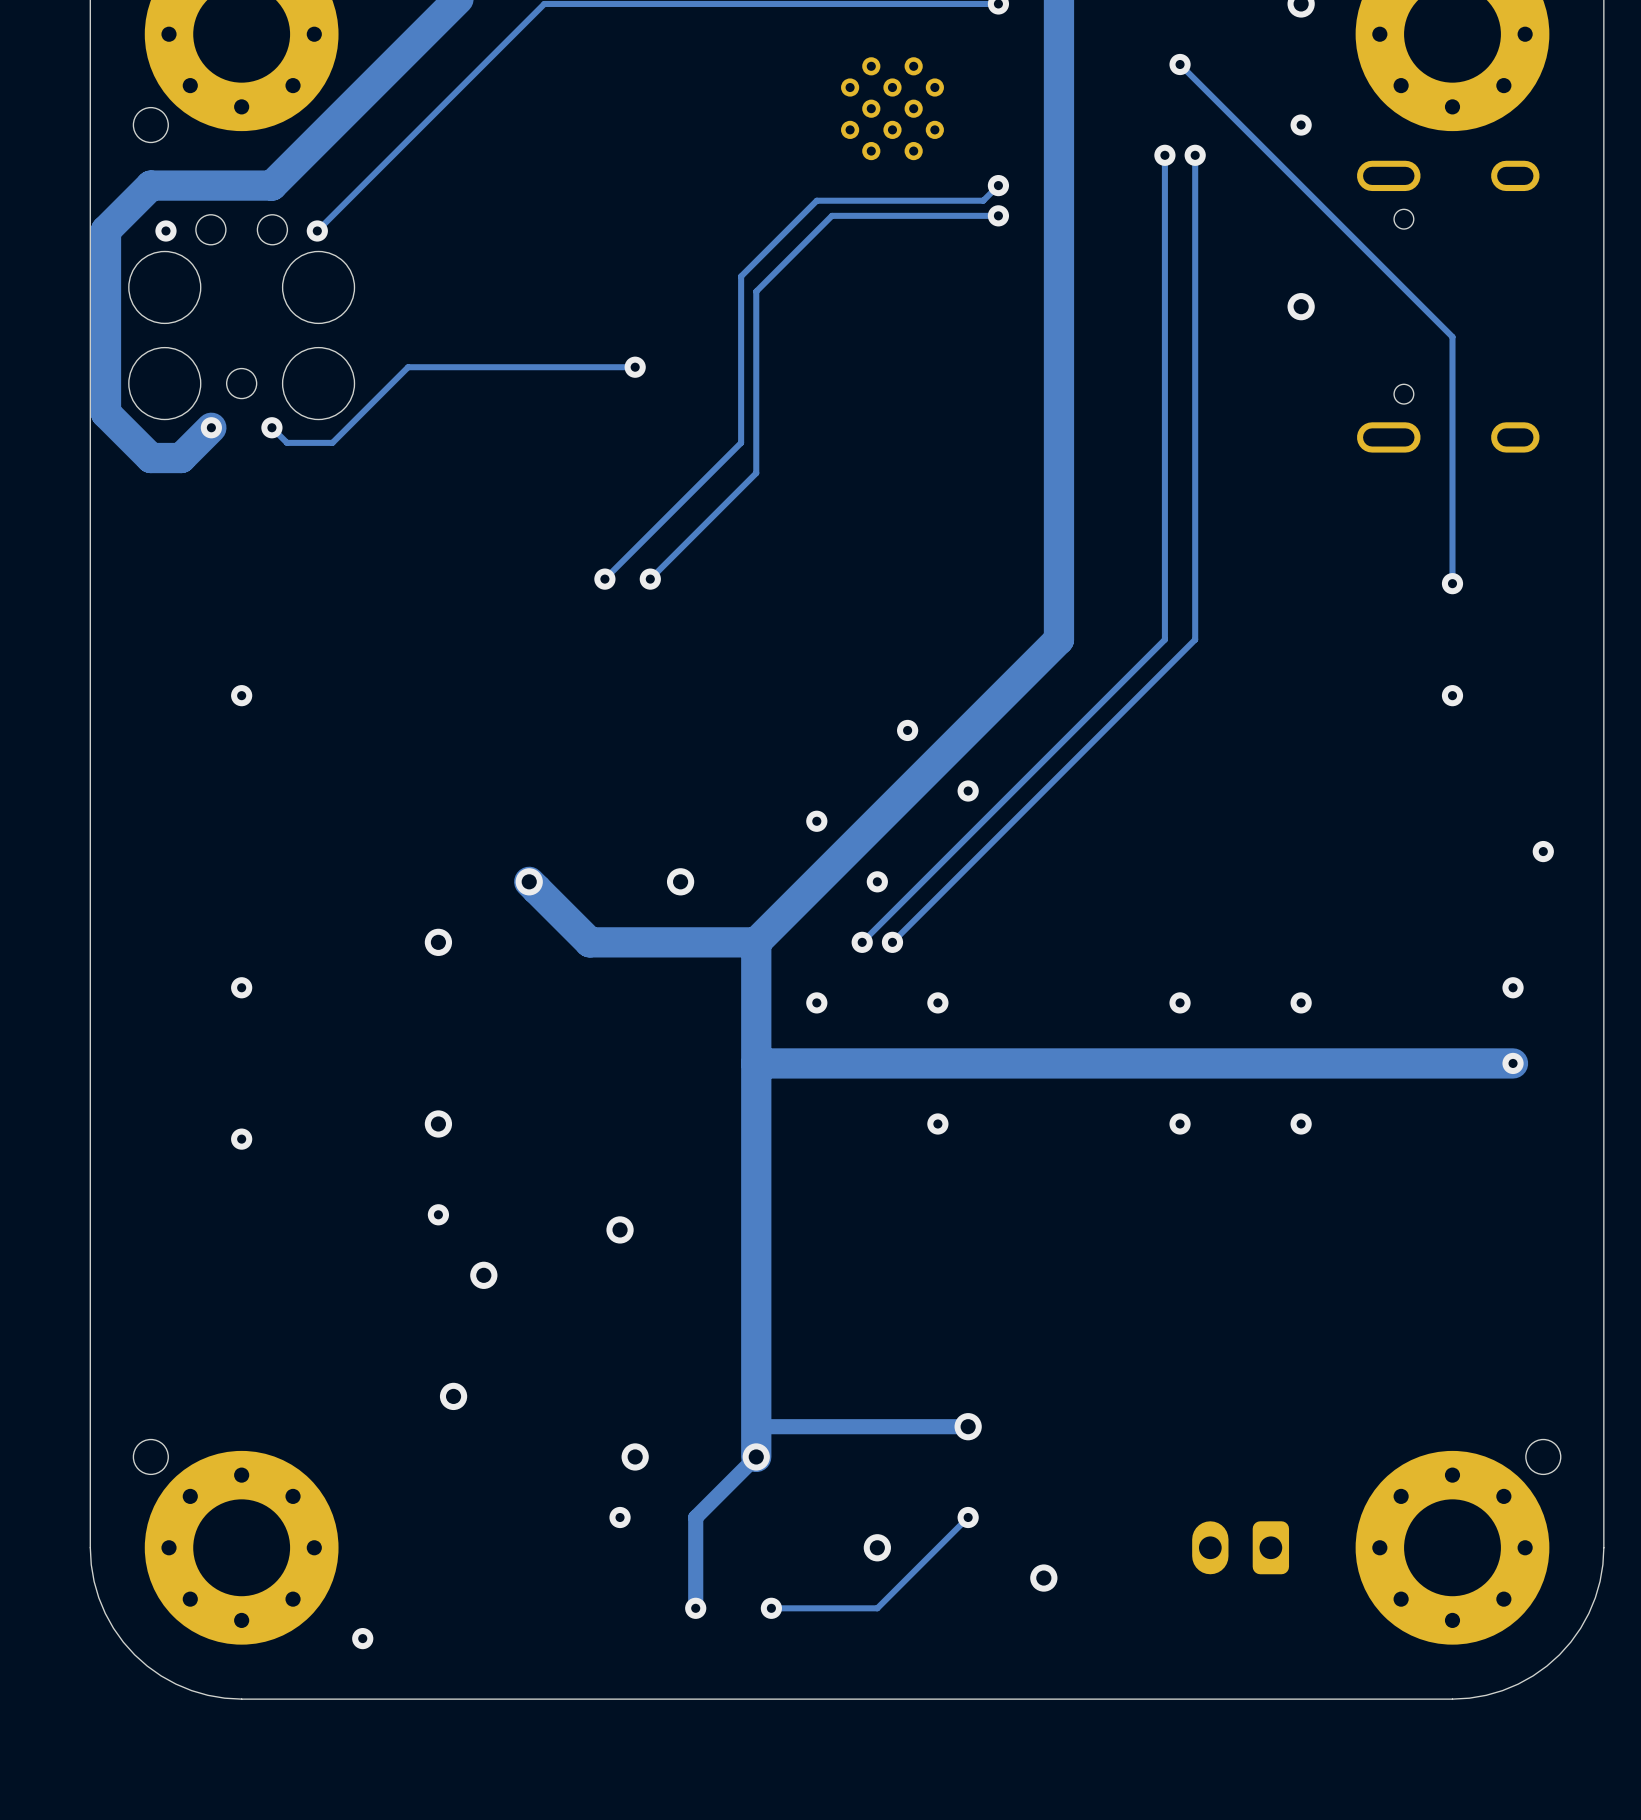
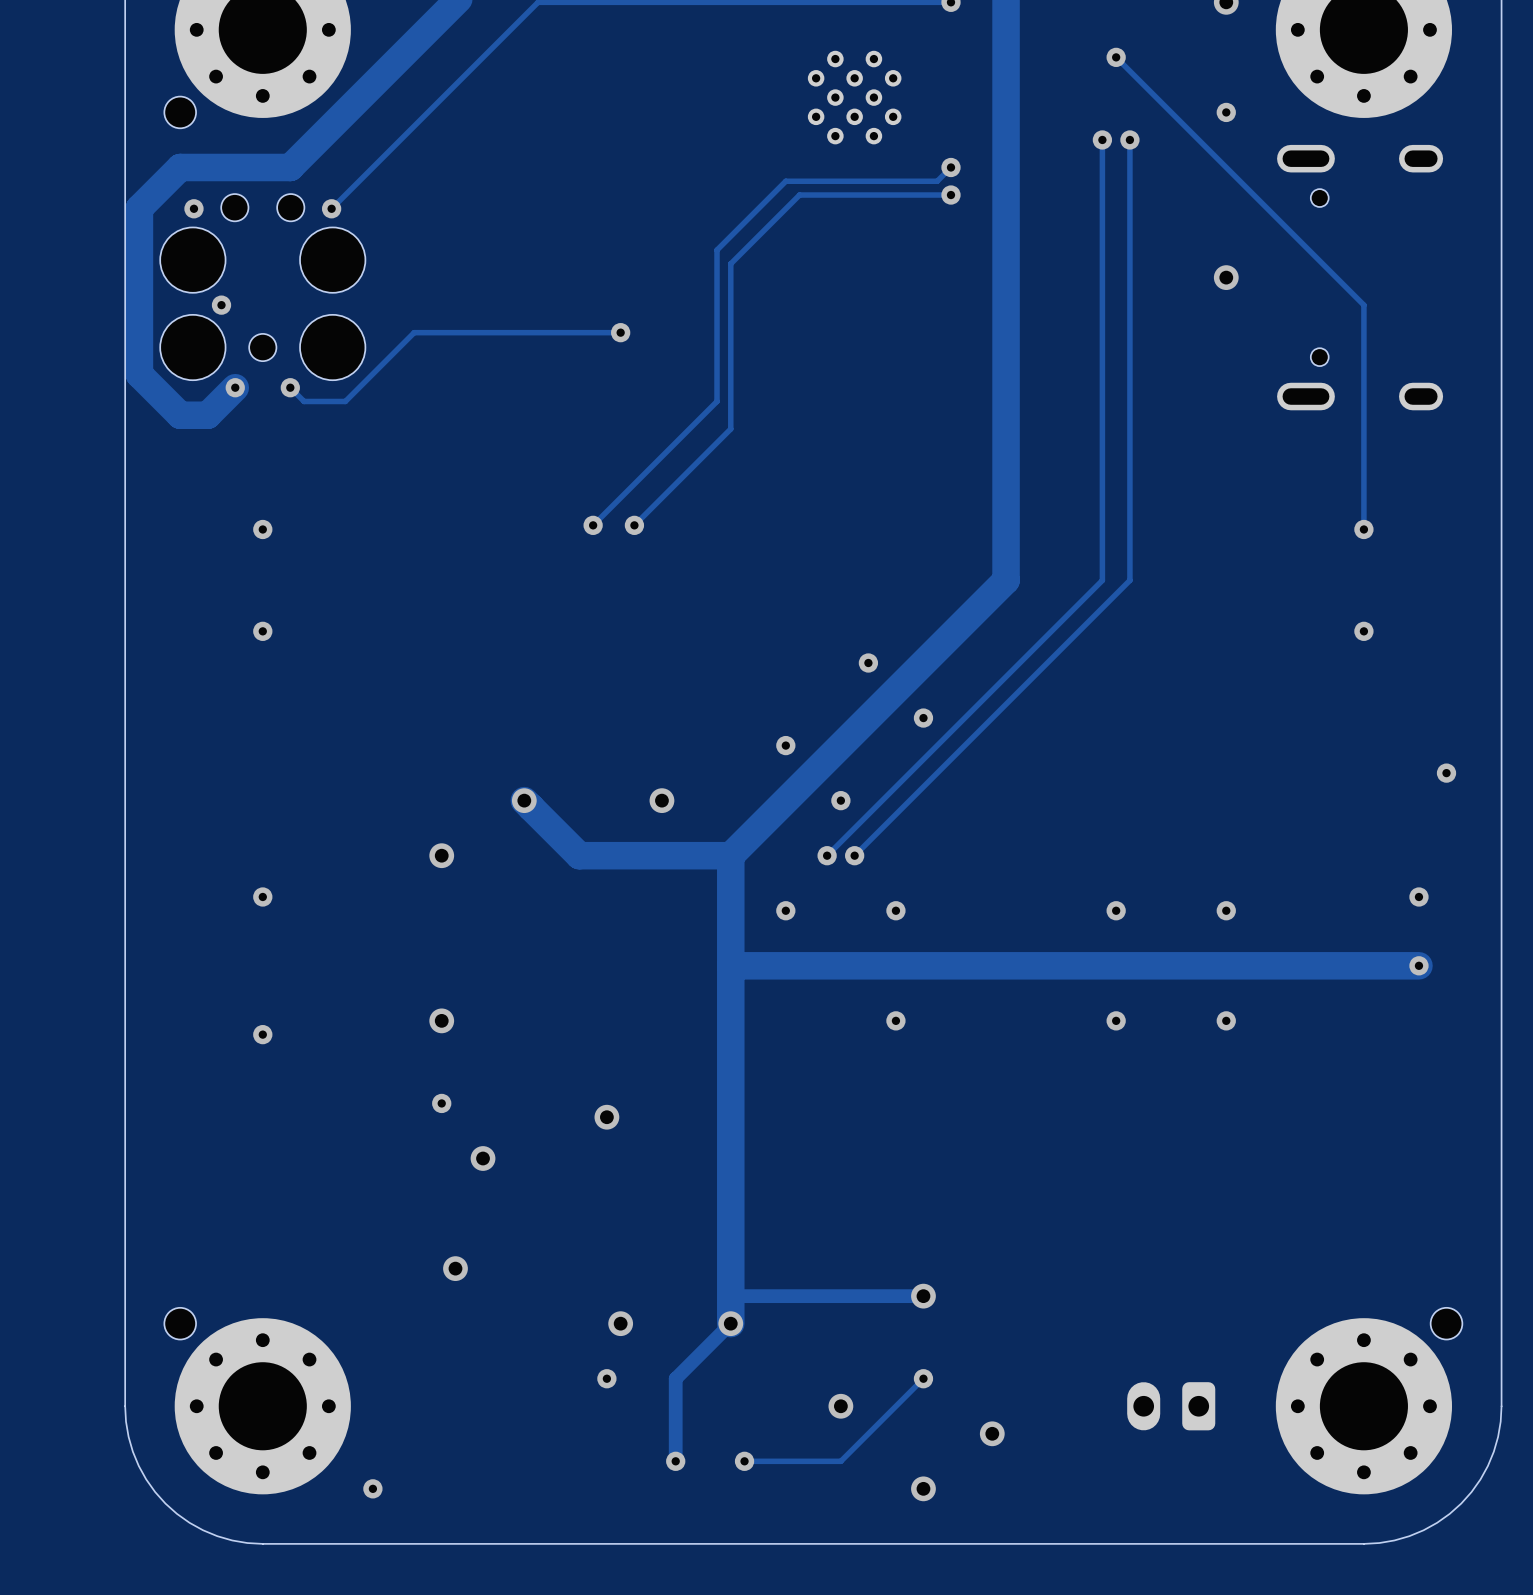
via: none -> (221, 305)
via: none -> (262, 529)
via: none -> (923, 1488)

